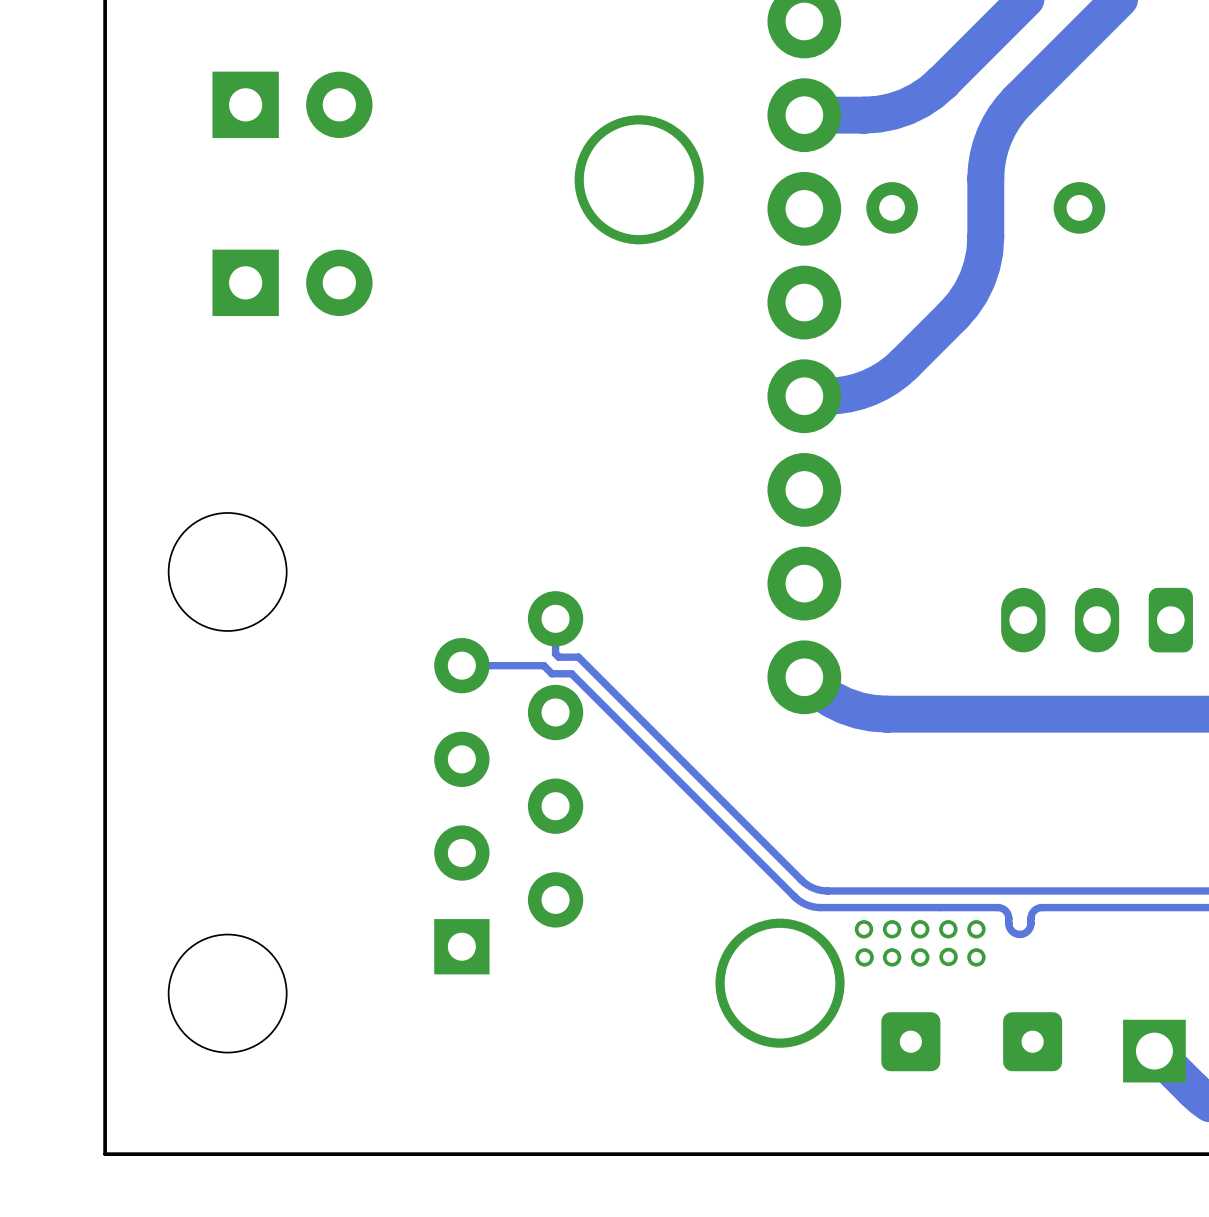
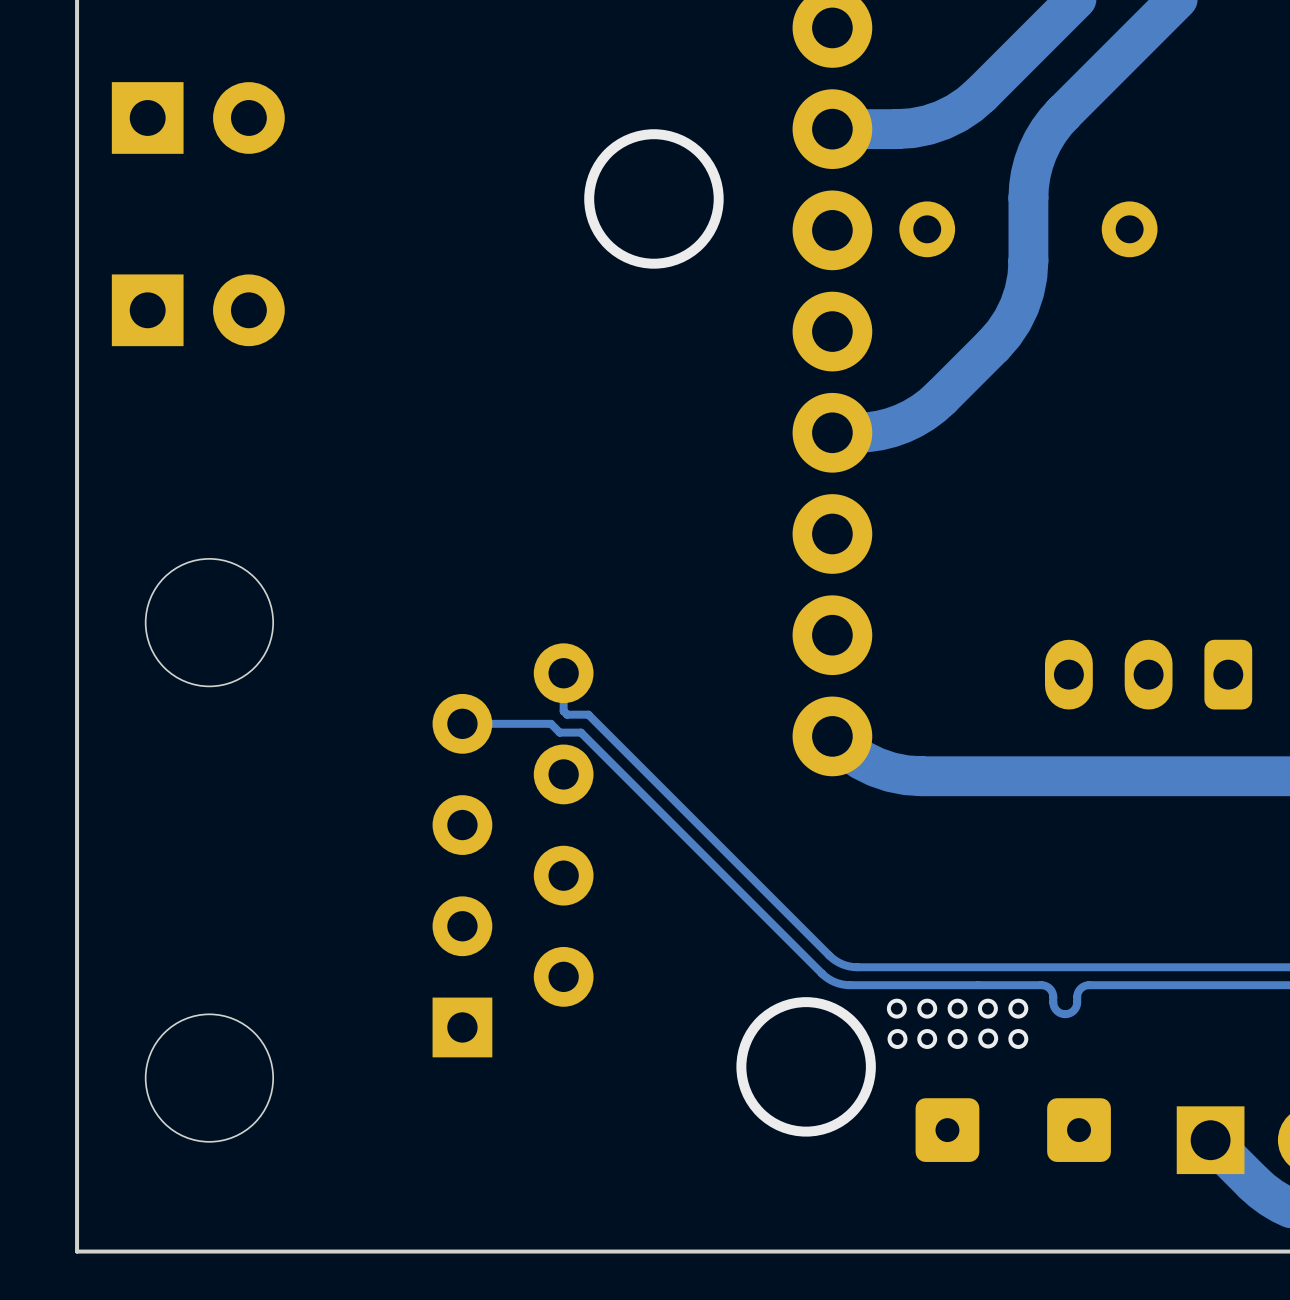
part position: (292, 104) -> (198, 117)
part position: (292, 282) -> (198, 310)

